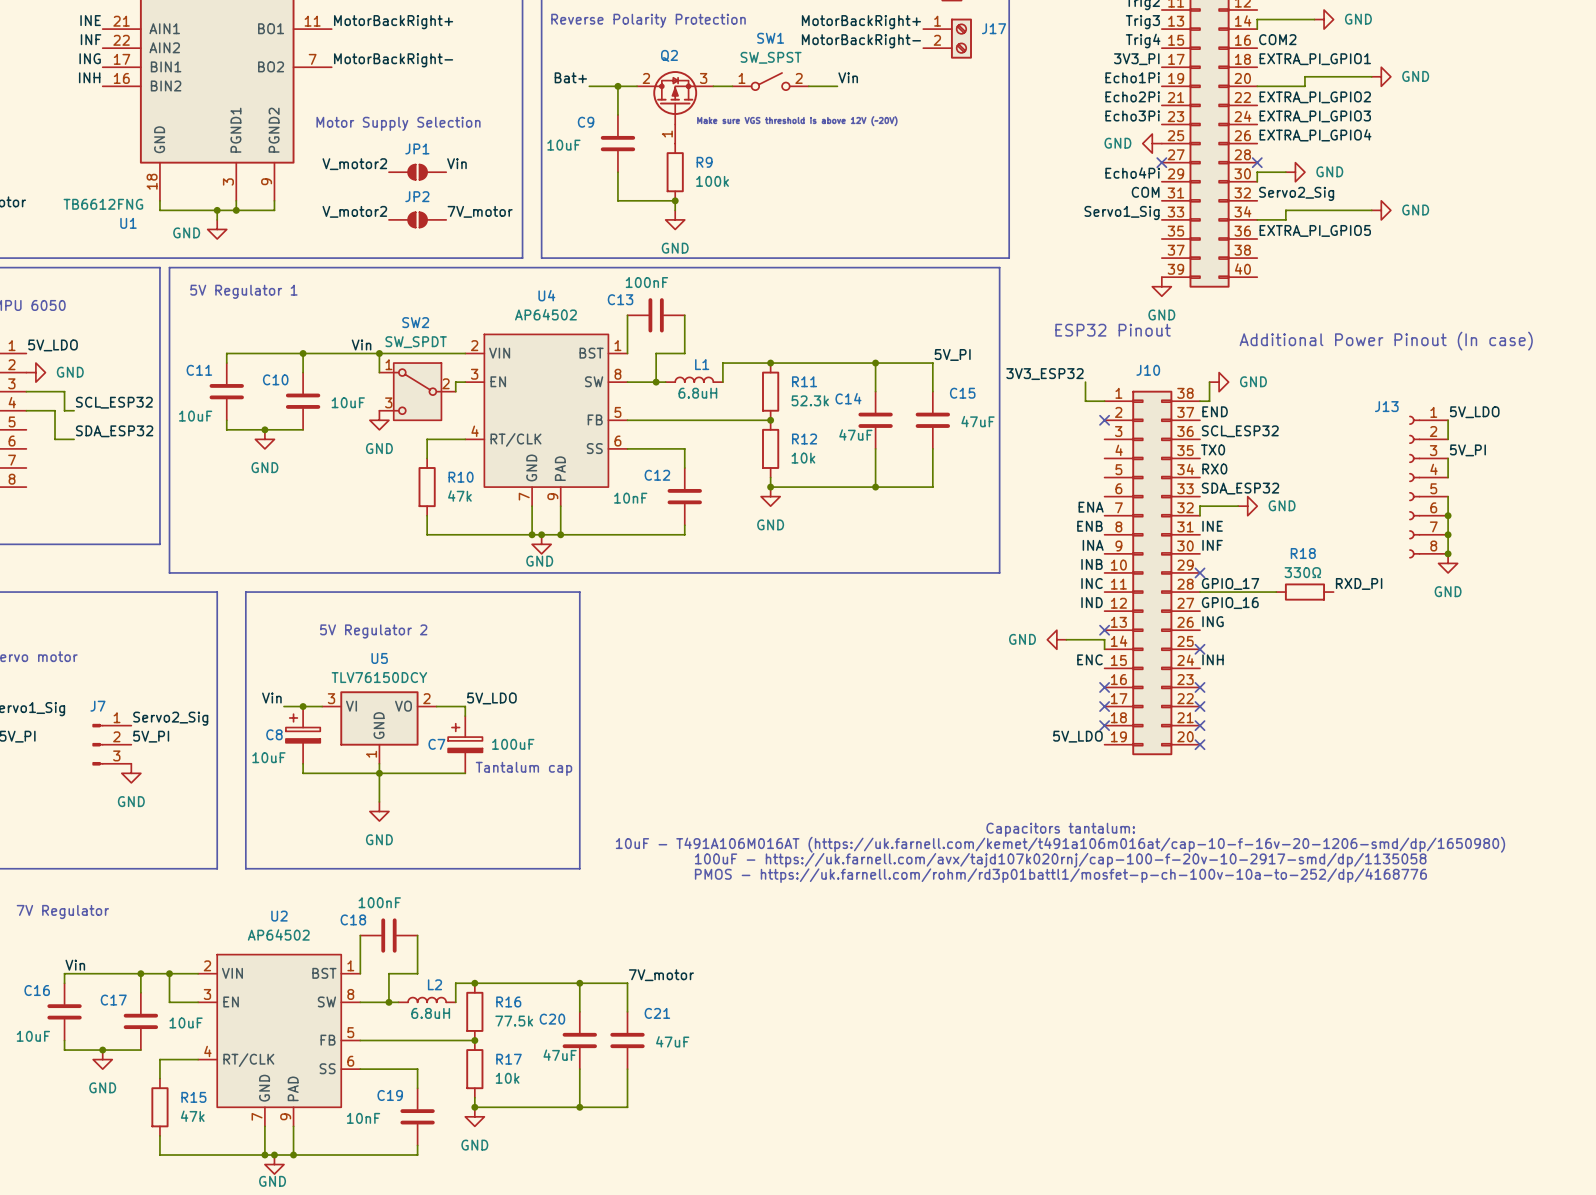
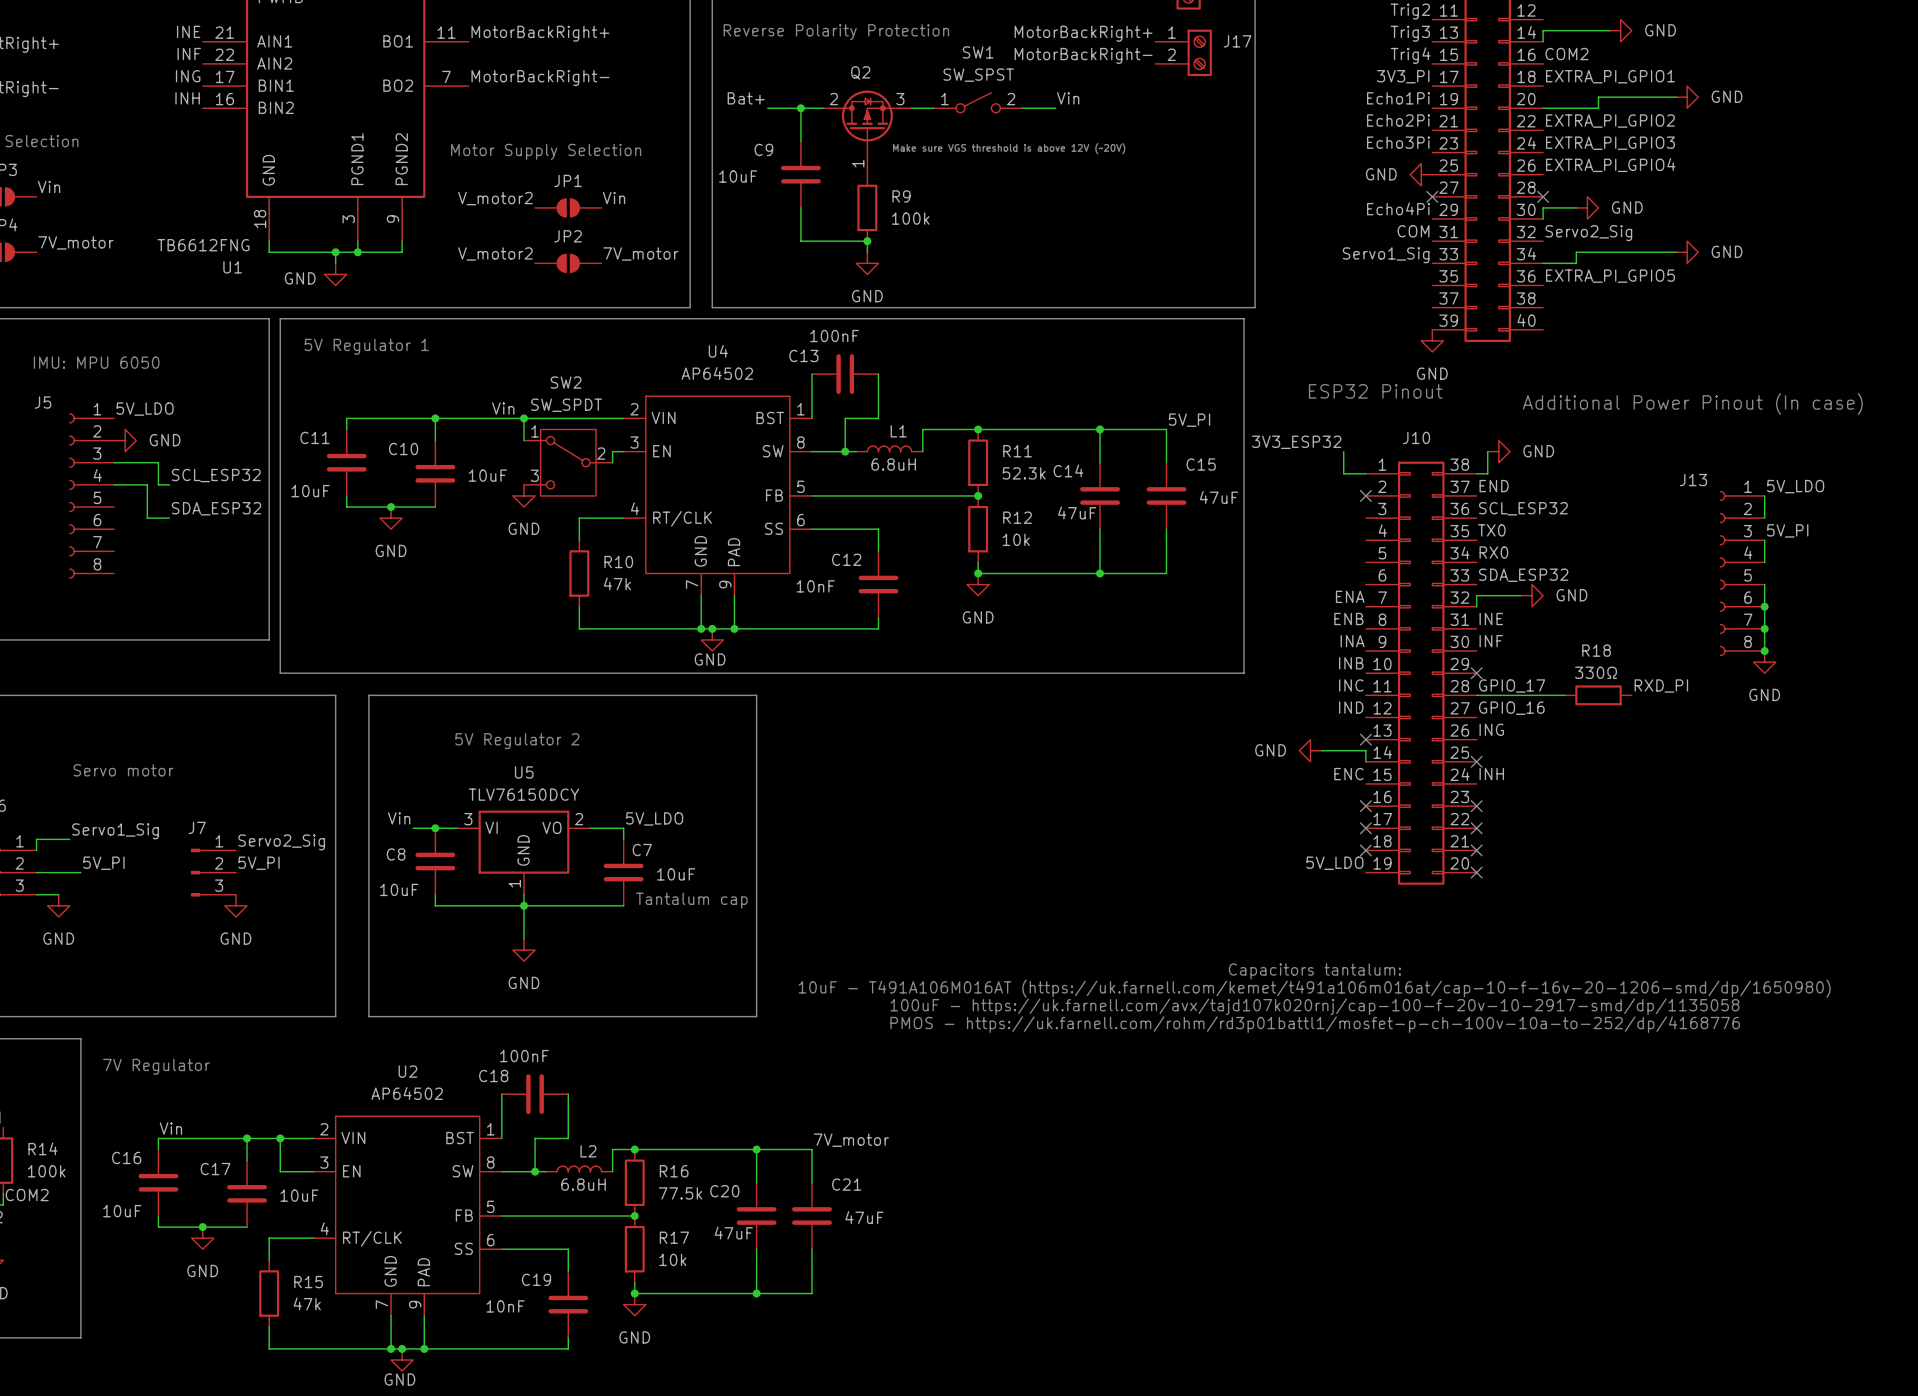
C8 symbol: [285, 706, 321, 764] -> [415, 828, 456, 895]
C7 symbol: [448, 716, 483, 774] -> [603, 839, 644, 906]
C7 name position: C7 (436, 744) -> C7 (642, 850)
C7 value: 100uF (513, 744) -> 10uF (676, 874)

